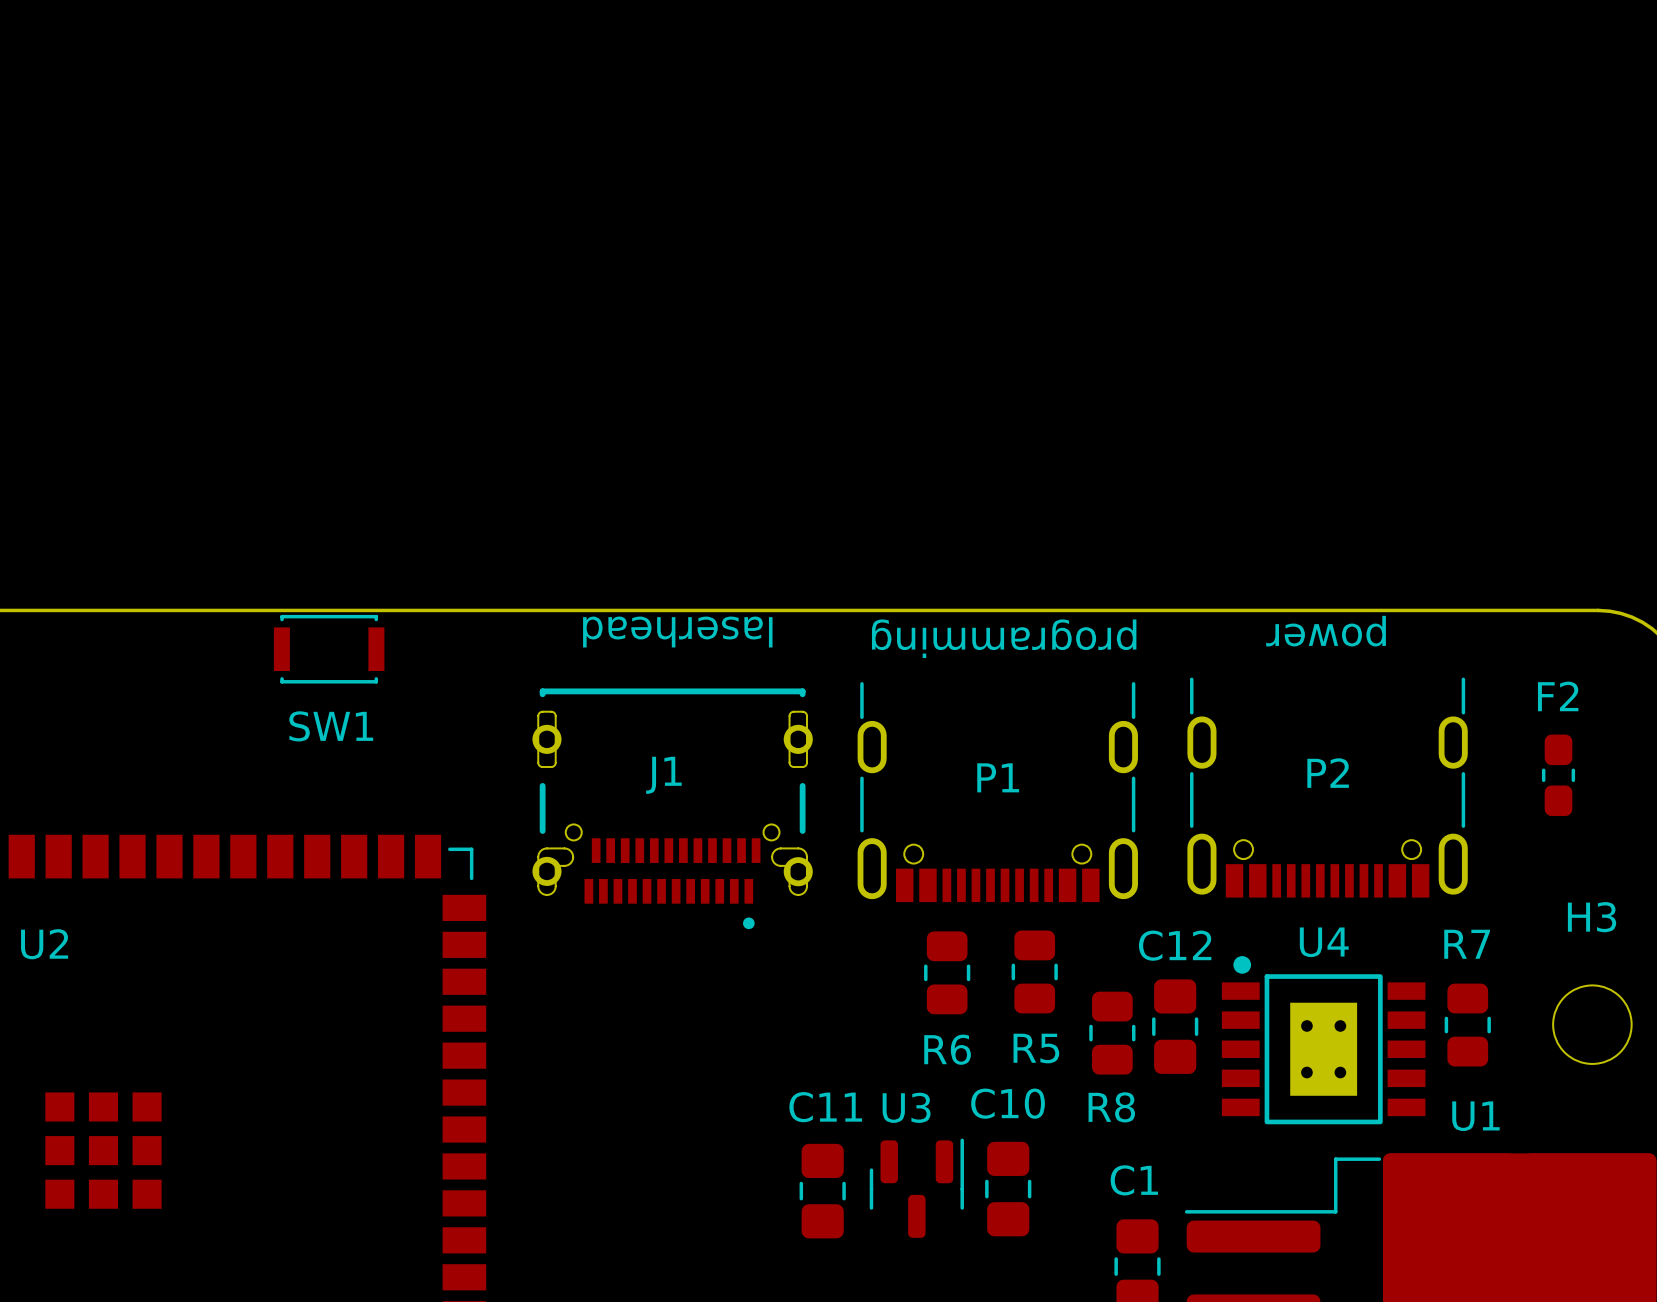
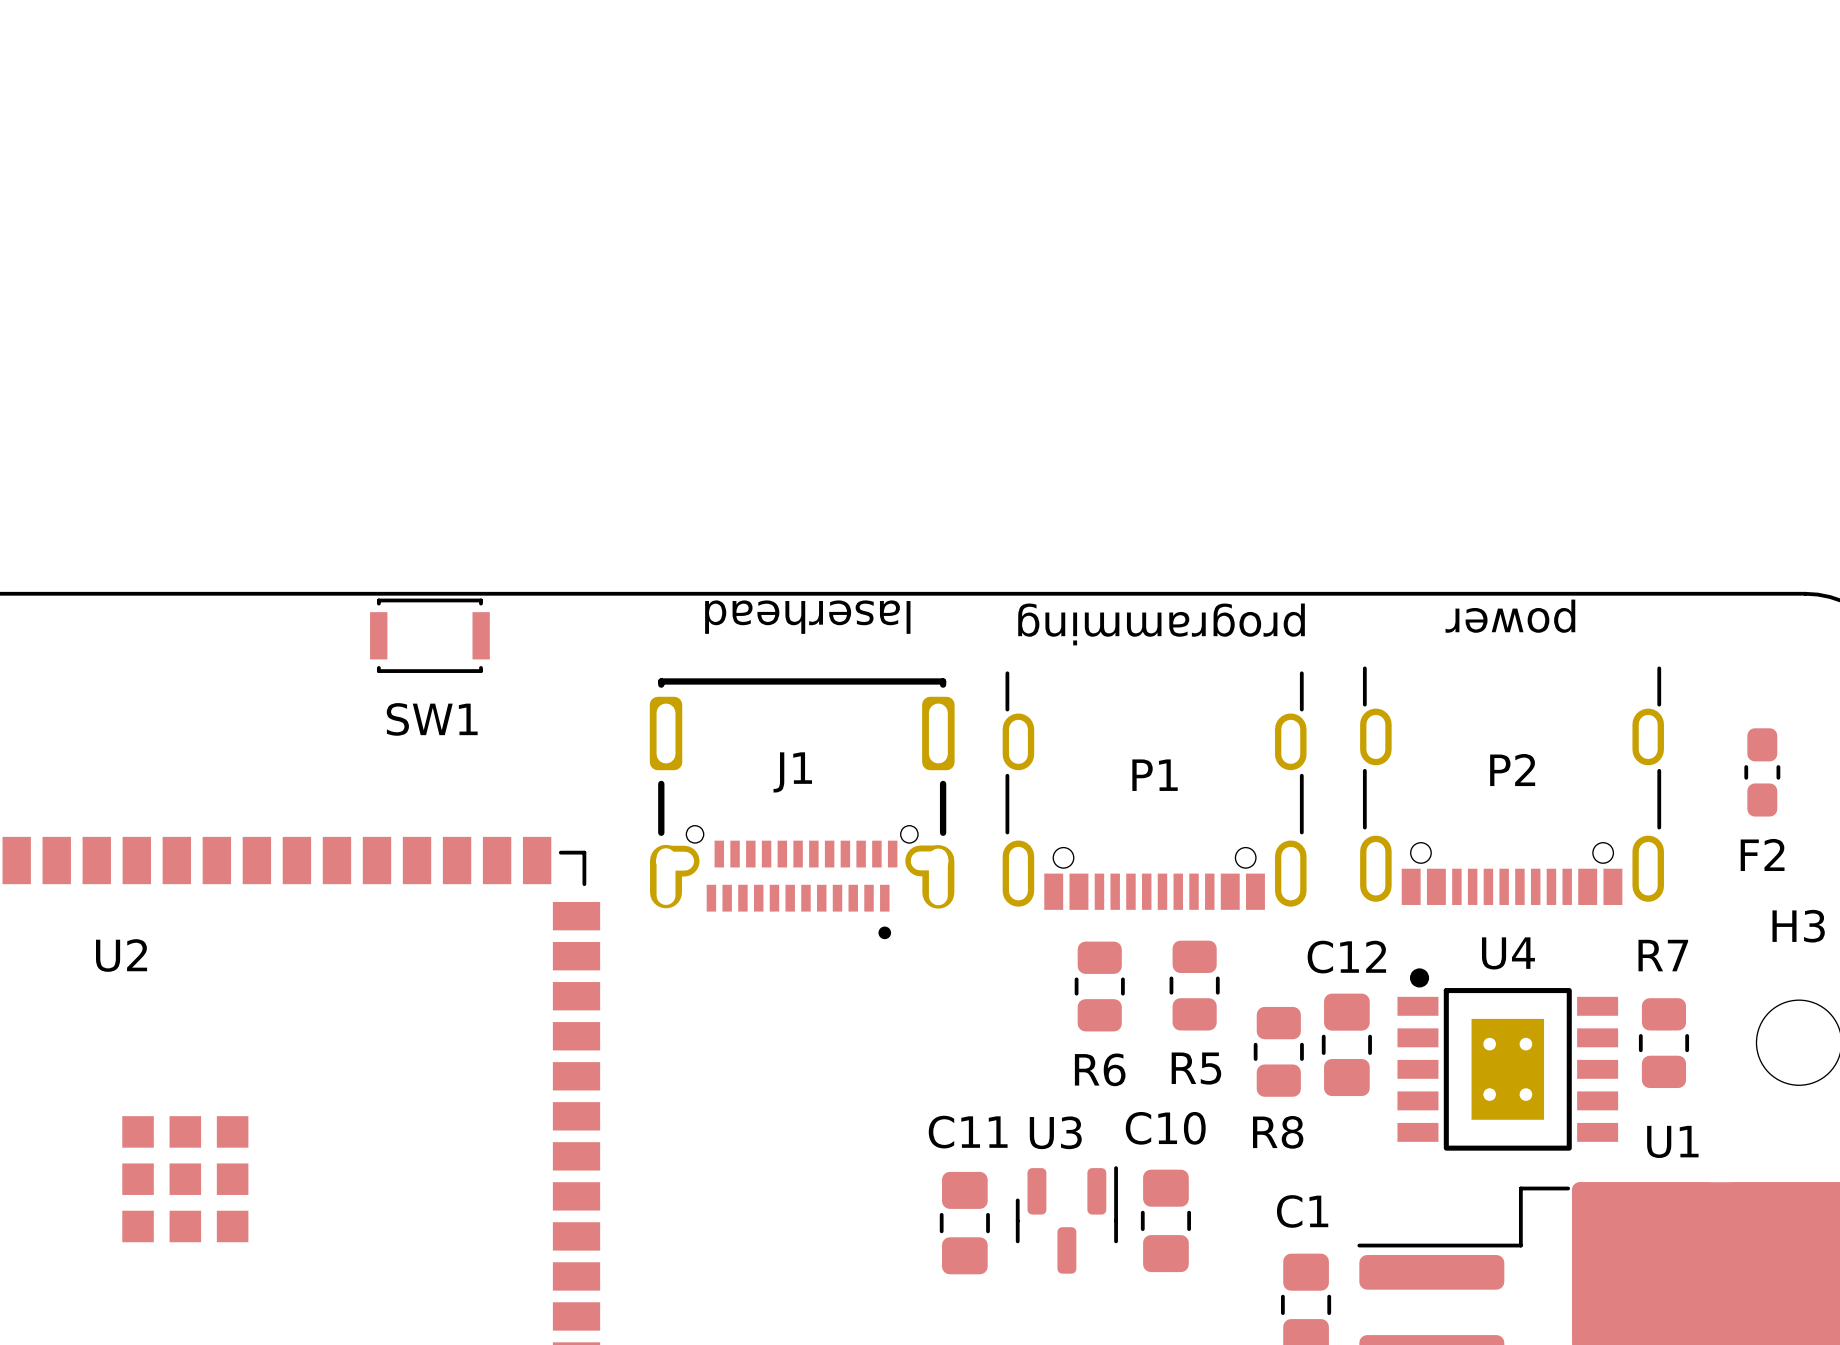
J1 footprint: [532, 688, 813, 930] -> [649, 678, 955, 940]
F2 name position: F2 (1558, 696) -> F2 (1762, 854)

